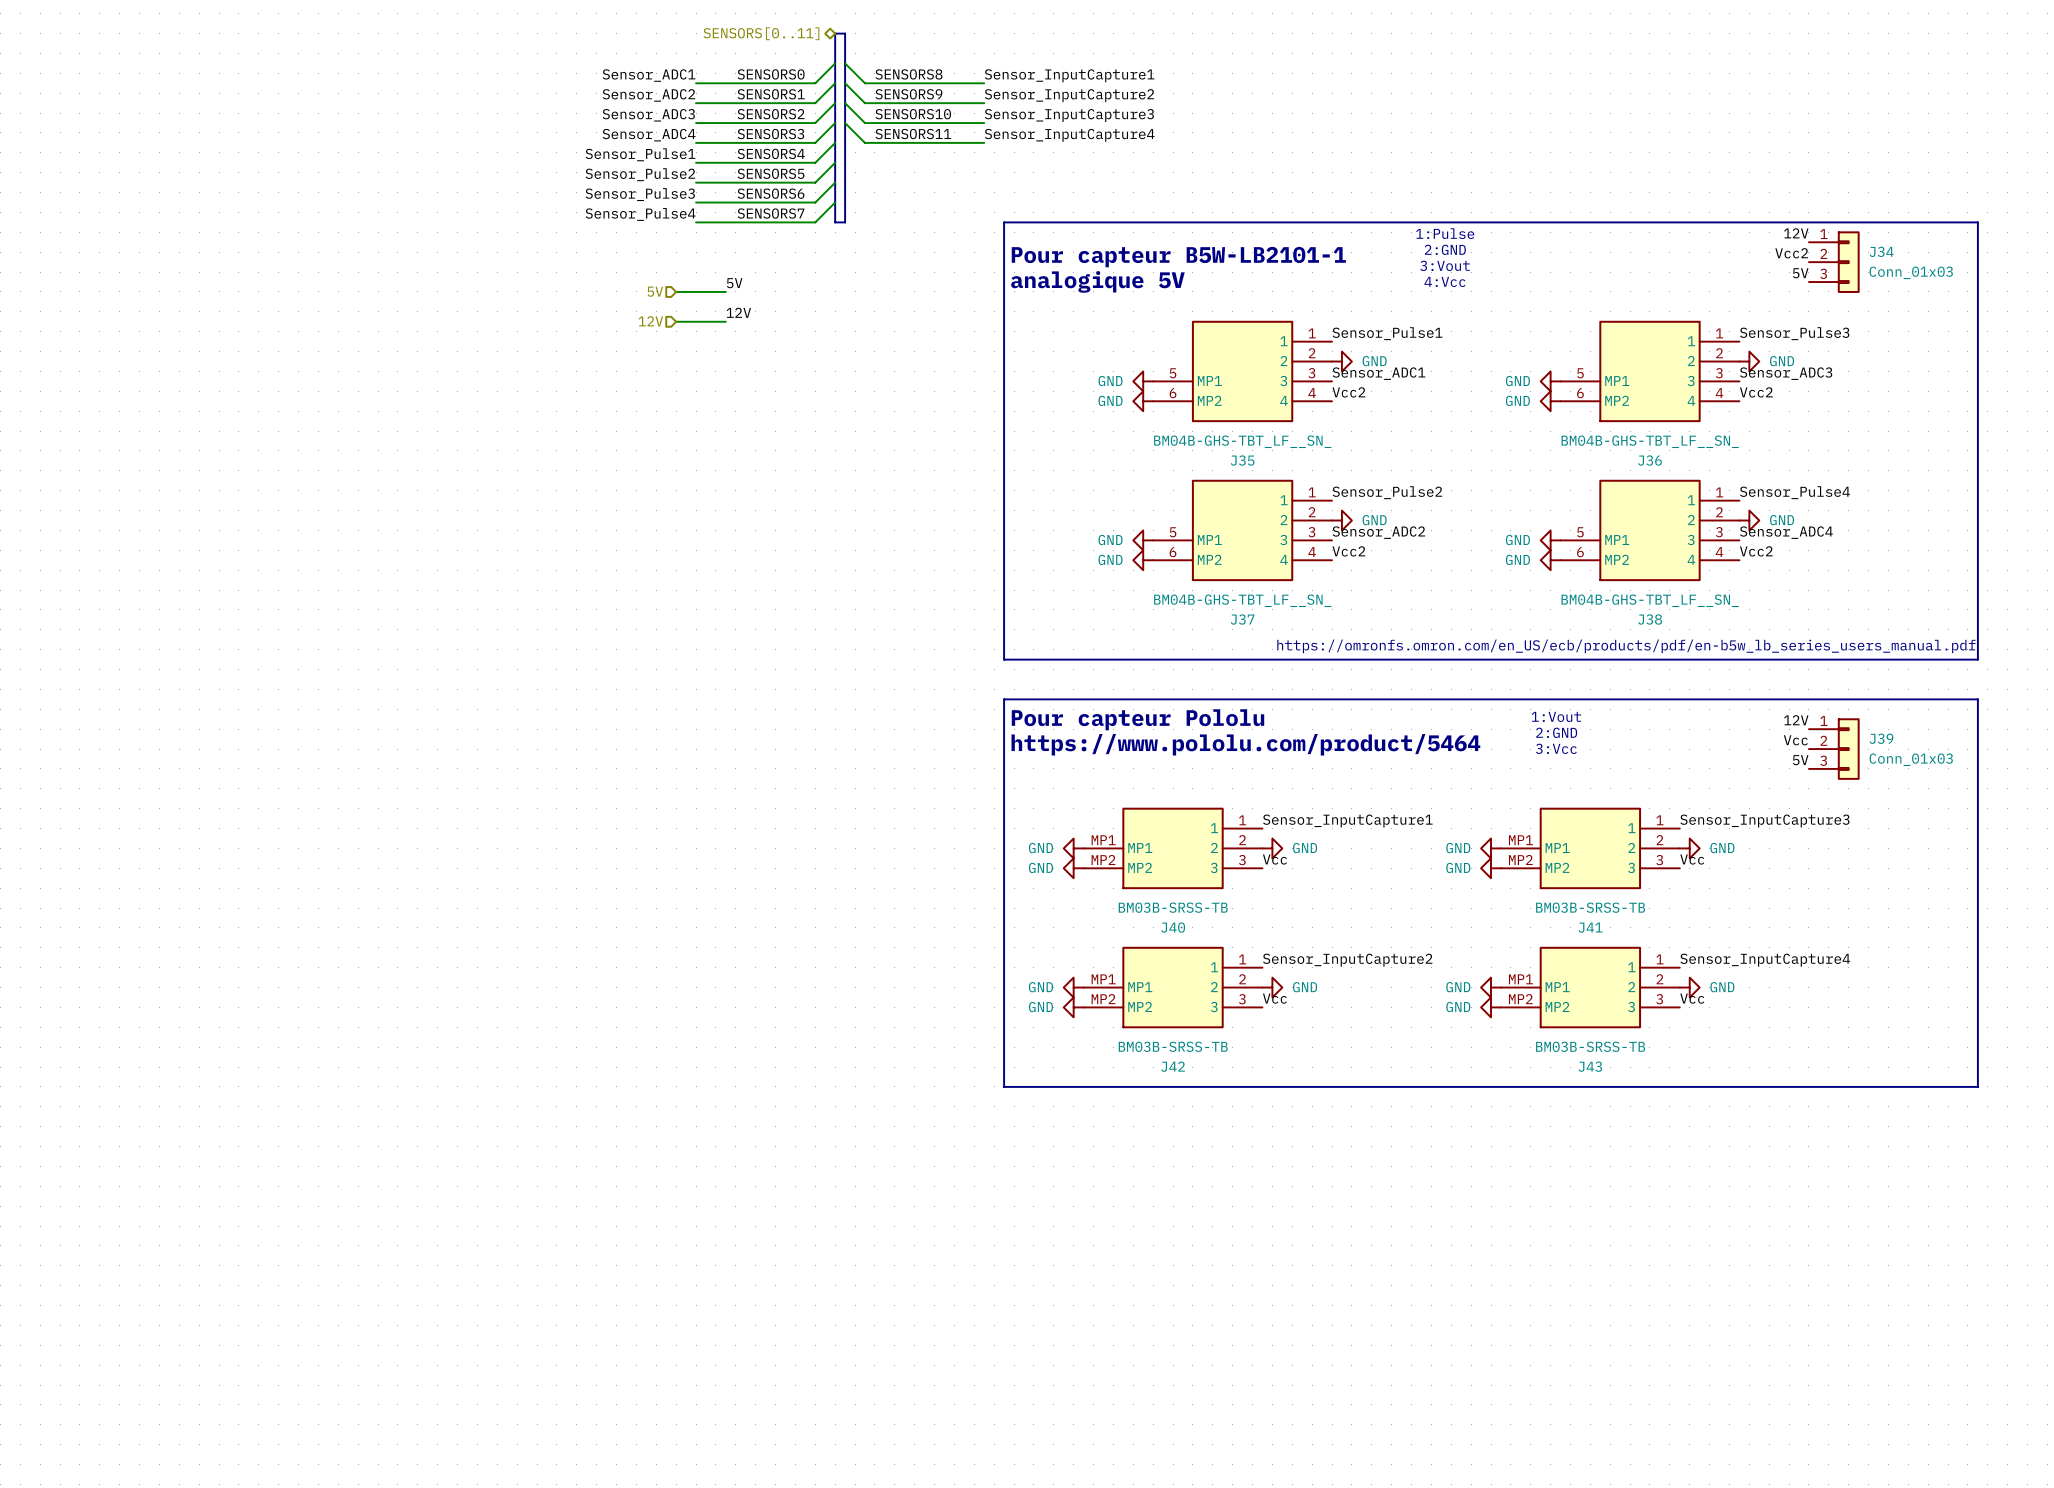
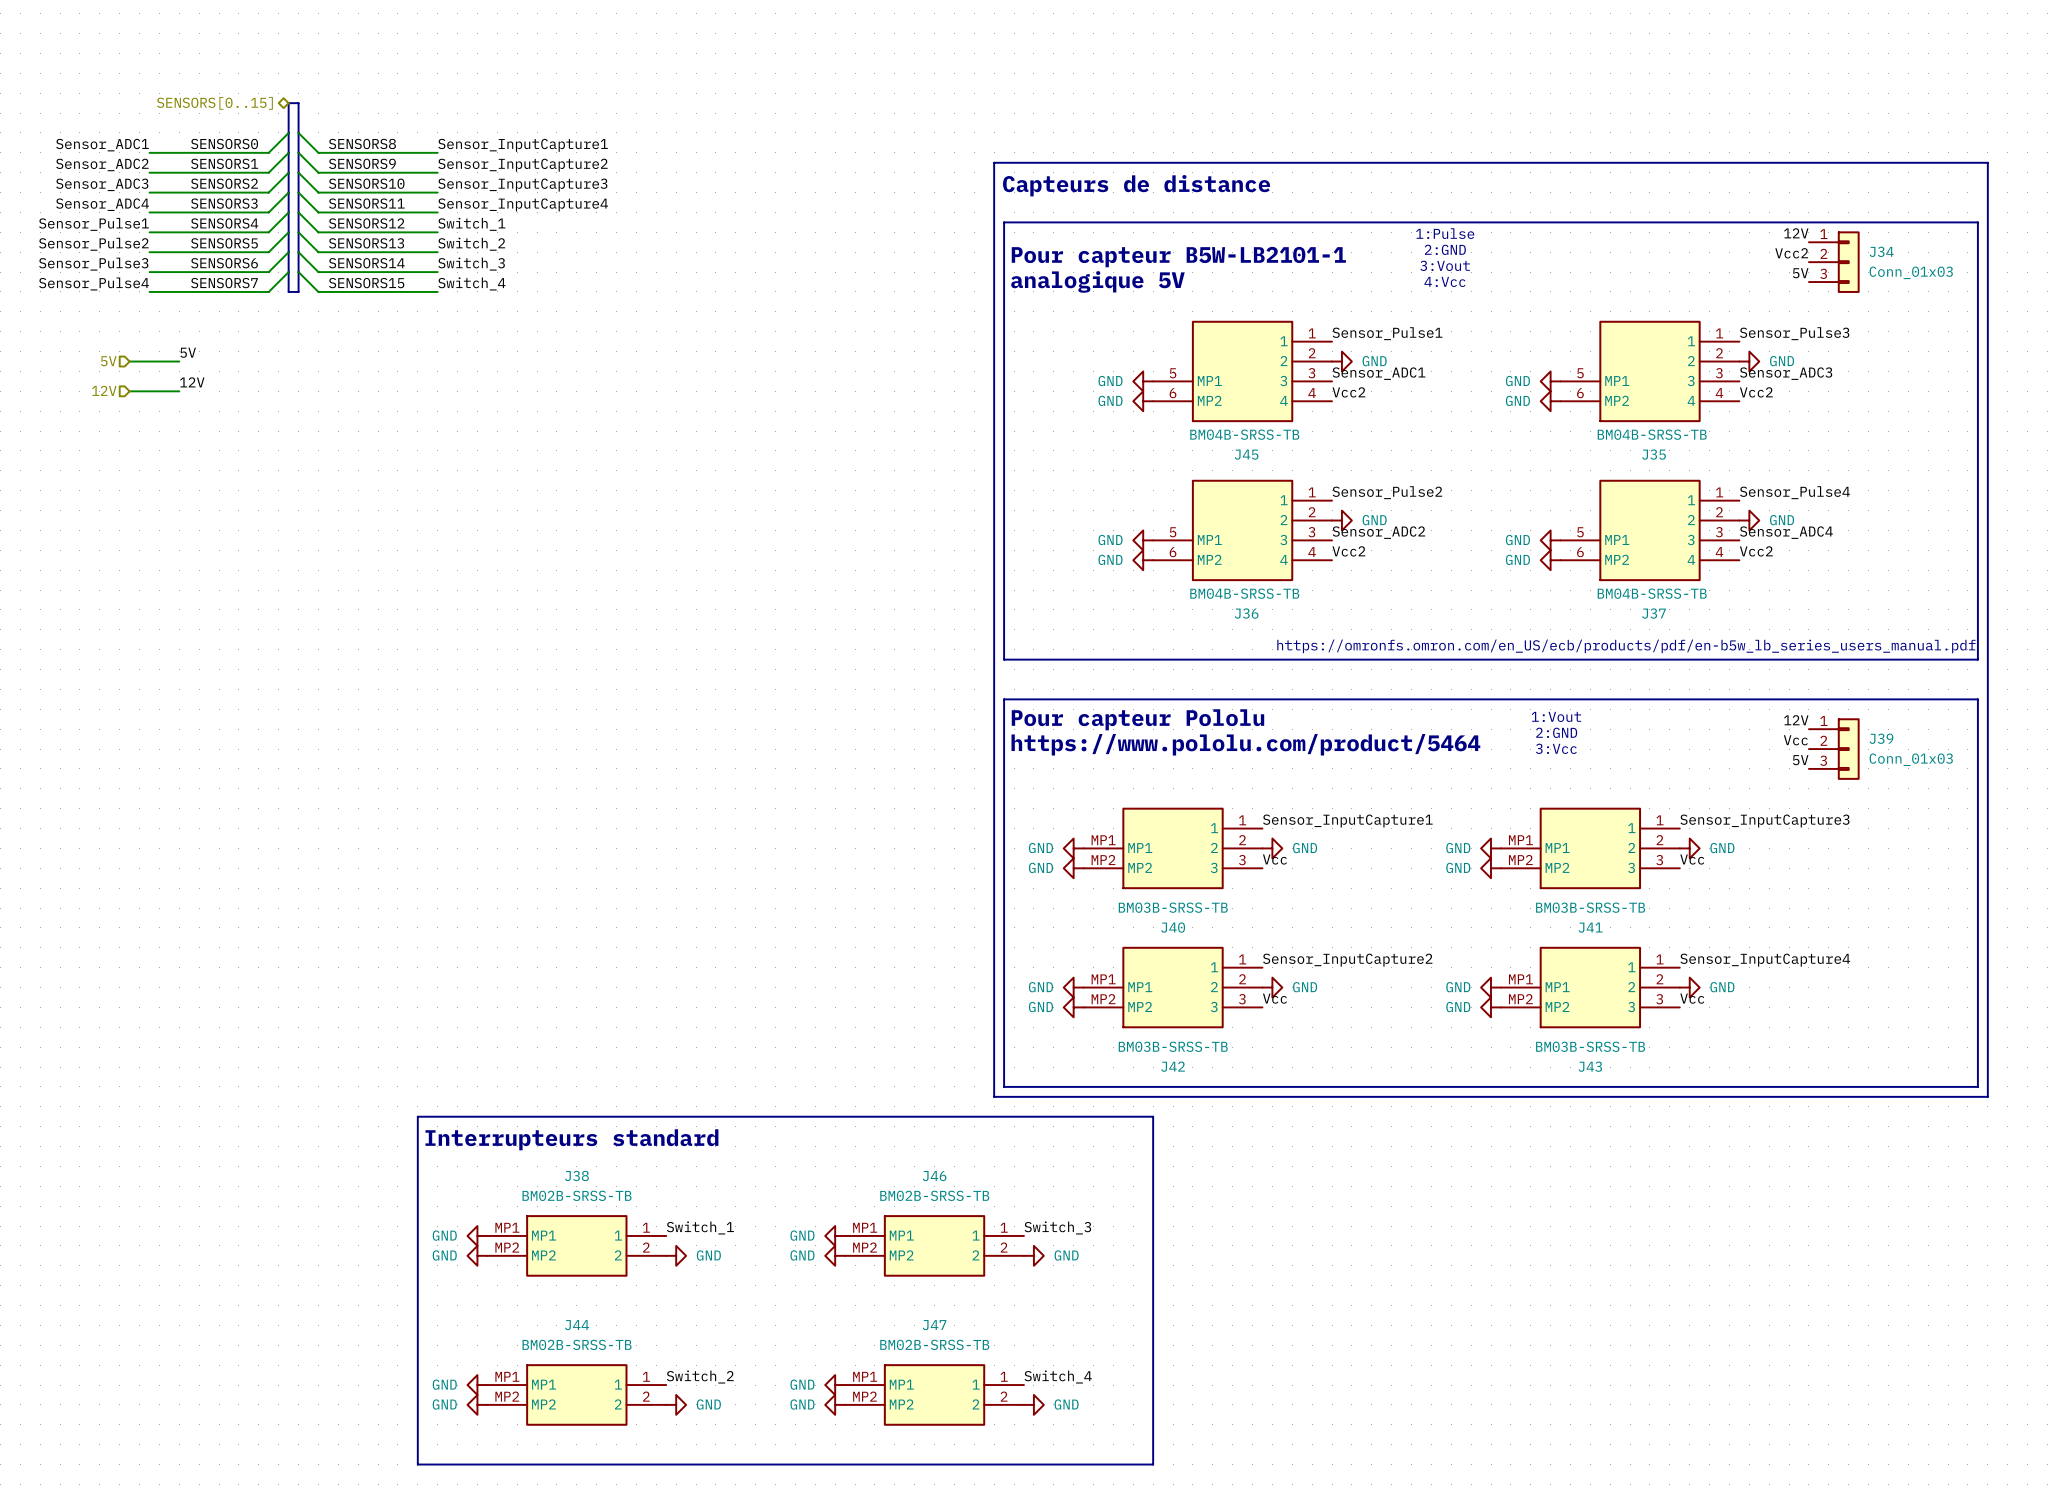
hierarchical label: SENSORS[0..11] (761, 33) -> none
bus: (835, 33) (835, 222) (845, 222) (845, 33) (835, 33) -> none
wire: (835, 63) (815, 83) (696, 83) -> none
wire: (845, 63) (864, 83) (984, 83) -> none
label: SENSORS0 (771, 74) -> none
label: SENSORS8 (909, 74) -> none
label: Sensor_ADC1 (649, 75) -> none
label: Sensor_InputCapture1 (1069, 75) -> none
wire: (835, 83) (815, 103) (696, 103) -> none
wire: (845, 83) (864, 103) (984, 103) -> none
label: SENSORS1 (771, 94) -> none
label: SENSORS9 (908, 94) -> none
label: Sensor_ADC2 (648, 95) -> none
label: Sensor_InputCapture2 (1069, 95) -> none
hierarchical label: none -> SENSORS[0..15] (214, 103)
bus: none -> (288, 103) (288, 291) (298, 291) (298, 103) (288, 103)
wire: (835, 103) (815, 123) (696, 123) -> none
wire: (845, 103) (864, 123) (984, 123) -> none
label: SENSORS2 (771, 114) -> none
label: SENSORS10 (913, 114) -> none
label: Sensor_ADC3 (648, 115) -> none
label: Sensor_InputCapture3 (1069, 115) -> none
wire: (835, 123) (815, 142) (696, 142) -> none
wire: (845, 123) (864, 142) (984, 142) -> none
wire: none -> (288, 132) (268, 152) (149, 152)
wire: none -> (298, 132) (318, 152) (437, 152)
label: SENSORS3 (770, 134) -> none
label: SENSORS11 (913, 134) -> none
label: Sensor_ADC4 (649, 135) -> none
label: Sensor_InputCapture4 (1069, 135) -> none
wire: (835, 142) (815, 162) (696, 162) -> none
label: none -> SENSORS0 (224, 143)
label: none -> SENSORS8 (362, 143)
label: none -> Sensor_ADC1 (102, 145)
label: none -> Sensor_InputCapture1 (523, 145)
wire: none -> (288, 152) (268, 172) (149, 172)
wire: none -> (298, 152) (318, 172) (437, 172)
label: SENSORS4 (771, 153) -> none
label: Sensor_Pulse1 (640, 154) -> none
wire: (835, 162) (815, 182) (696, 182) -> none
line: none -> (994, 162) (1987, 162) (1987, 1096) (994, 1096) (994, 162)
label: none -> SENSORS1 (224, 163)
label: none -> SENSORS9 (362, 163)
label: none -> Sensor_ADC2 (102, 164)
label: none -> Sensor_InputCapture2 (522, 165)
wire: none -> (288, 172) (268, 192) (149, 192)
wire: none -> (298, 172) (318, 192) (437, 192)
label: SENSORS5 (771, 173) -> none
label: Sensor_Pulse2 (640, 174) -> none
wire: (835, 182) (815, 202) (696, 202) -> none
label: none -> SENSORS2 (224, 183)
label: none -> SENSORS10 (366, 183)
label: none -> Sensor_ADC3 (102, 184)
label: none -> Sensor_InputCapture3 (522, 185)
text: none -> Capteurs de distance (1136, 185)
wire: none -> (288, 192) (268, 212) (149, 212)
wire: none -> (298, 192) (318, 212) (437, 212)
label: SENSORS6 (771, 193) -> none
label: Sensor_Pulse3 (640, 194) -> none
wire: (835, 202) (815, 222) (696, 222) -> none
label: none -> SENSORS3 (224, 203)
label: none -> SENSORS11 (366, 203)
label: none -> Sensor_ADC4 (102, 204)
label: none -> Sensor_InputCapture4 (523, 204)
wire: none -> (288, 212) (268, 232) (149, 232)
wire: none -> (298, 212) (318, 232) (437, 232)
label: SENSORS7 (771, 213) -> none
label: Sensor_Pulse4 (640, 214) -> none
label: none -> SENSORS4 (224, 223)
label: none -> SENSORS12 (366, 223)
label: none -> Sensor_Pulse1 (93, 224)
label: none -> Switch_1 (471, 224)
wire: none -> (288, 232) (268, 252) (149, 252)
wire: none -> (298, 232) (318, 252) (437, 252)
label: none -> SENSORS5 (224, 243)
label: none -> SENSORS13 (366, 243)
label: none -> Sensor_Pulse2 (93, 244)
label: none -> Switch_2 (471, 244)
wire: none -> (288, 252) (268, 272) (149, 272)
wire: none -> (298, 252) (318, 272) (437, 272)
label: none -> SENSORS6 (224, 263)
label: none -> SENSORS14 (366, 263)
label: none -> Sensor_Pulse3 (93, 264)
label: none -> Switch_3 (471, 264)
wire: none -> (288, 272) (268, 291) (149, 291)
wire: none -> (298, 272) (318, 291) (437, 291)
label: none -> SENSORS7 (224, 283)
label: none -> SENSORS15 (366, 283)
label: none -> Switch_4 (471, 283)
label: 5V (734, 283) -> none
label: none -> Sensor_Pulse4 (94, 284)
hierarchical label: 5V (655, 291) -> none
wire: (676, 291) (725, 291) -> none
label: 12V (738, 312) -> none
hierarchical label: 12V (650, 321) -> none
wire: (676, 321) (725, 321) -> none
label: none -> 5V (188, 352)
hierarchical label: none -> 5V (108, 361)
wire: none -> (129, 361) (179, 361)
label: none -> 12V (192, 382)
hierarchical label: none -> 12V (104, 390)
wire: none -> (129, 391) (179, 391)
J35 value: BM04B-GHS-TBT_LF__SN_ (1242, 441) -> BM04B-SRSS-TB (1244, 434)
J36 value: BM04B-GHS-TBT_LF__SN_ (1650, 441) -> BM04B-SRSS-TB (1652, 434)
J35 name: J35 (1242, 460) -> J45 (1246, 454)
J36 name: J36 (1650, 460) -> J35 (1654, 454)
J37 value: BM04B-GHS-TBT_LF__SN_ (1242, 600) -> BM04B-SRSS-TB (1244, 593)
J38 value: BM04B-GHS-TBT_LF__SN_ (1650, 600) -> BM04B-SRSS-TB (1652, 593)
J37 name: J37 (1242, 619) -> J36 (1246, 613)
J38 name: J38 (1650, 619) -> J37 (1654, 613)
line: none -> (417, 1116) (1153, 1116) (1153, 1464) (417, 1464) (417, 1116)
text: none -> Interrupteurs standard (571, 1139)
label: none -> Switch_1 (700, 1227)
label: none -> Switch_3 (1057, 1227)
power symbol: none -> GND (477, 1235)
power symbol: none -> GND (835, 1235)
J38: none -> BM02B-SRSS-TB (576, 1245)
J46: none -> BM02B-SRSS-TB (934, 1245)
power symbol: none -> GND (477, 1255)
power symbol: none -> GND (676, 1255)
power symbol: none -> GND (835, 1255)
power symbol: none -> GND (1033, 1255)
label: none -> Switch_2 (700, 1377)
label: none -> Switch_4 (1058, 1377)
power symbol: none -> GND (477, 1385)
power symbol: none -> GND (835, 1385)
J44: none -> BM02B-SRSS-TB (576, 1394)
J47: none -> BM02B-SRSS-TB (934, 1394)
power symbol: none -> GND (477, 1404)
power symbol: none -> GND (676, 1404)
power symbol: none -> GND (835, 1404)
power symbol: none -> GND (1033, 1404)

